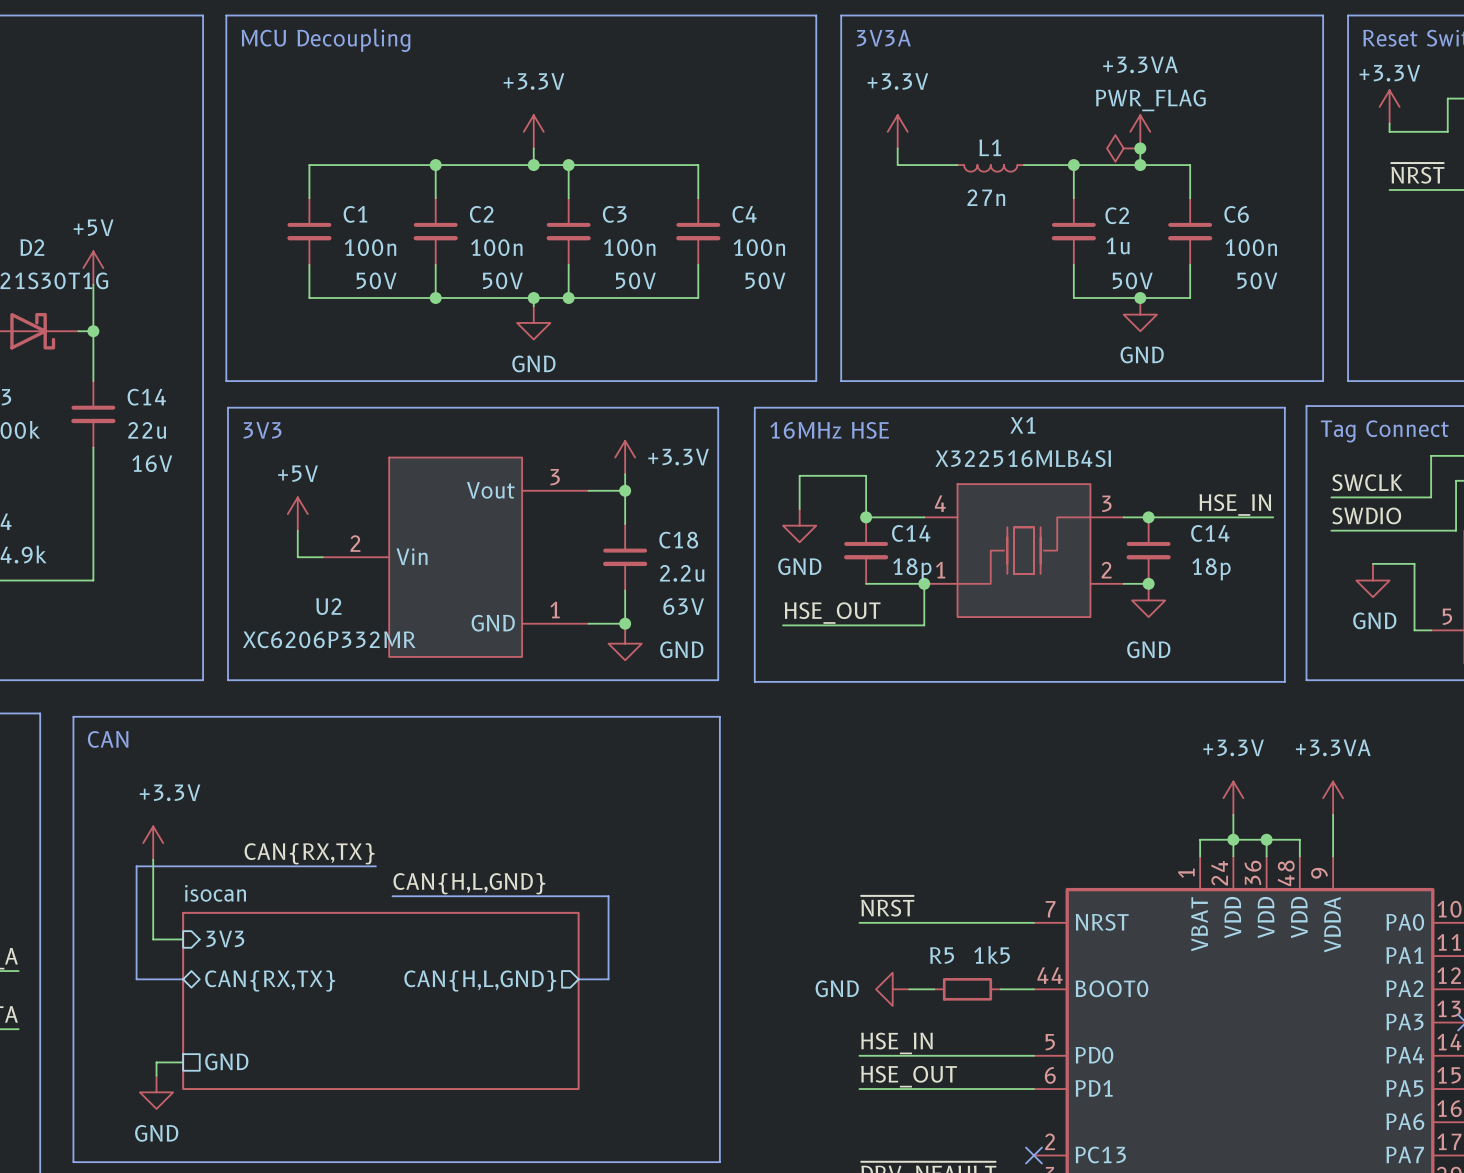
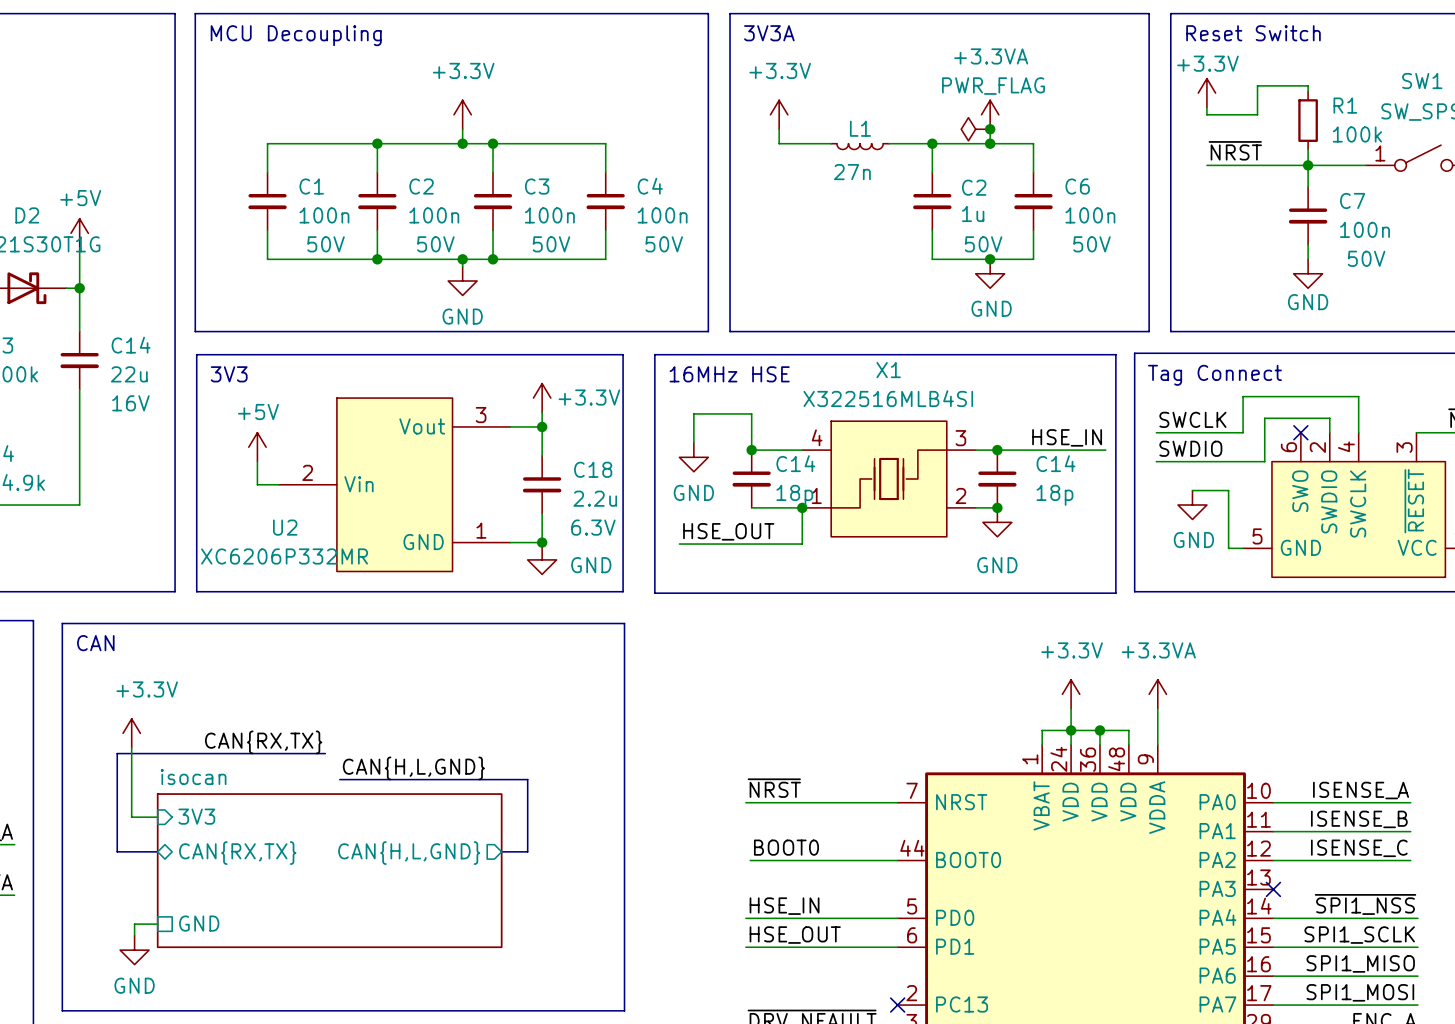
C18 text: 63V (683, 606) -> 6.3V (593, 527)
label: none -> BOOT0 (786, 847)
wire: none -> (750, 860) (789, 860)
power symbol: GND (892, 989) -> none
wire: none -> (810, 860) (868, 860)
R5: 1k5 (967, 989) -> none

